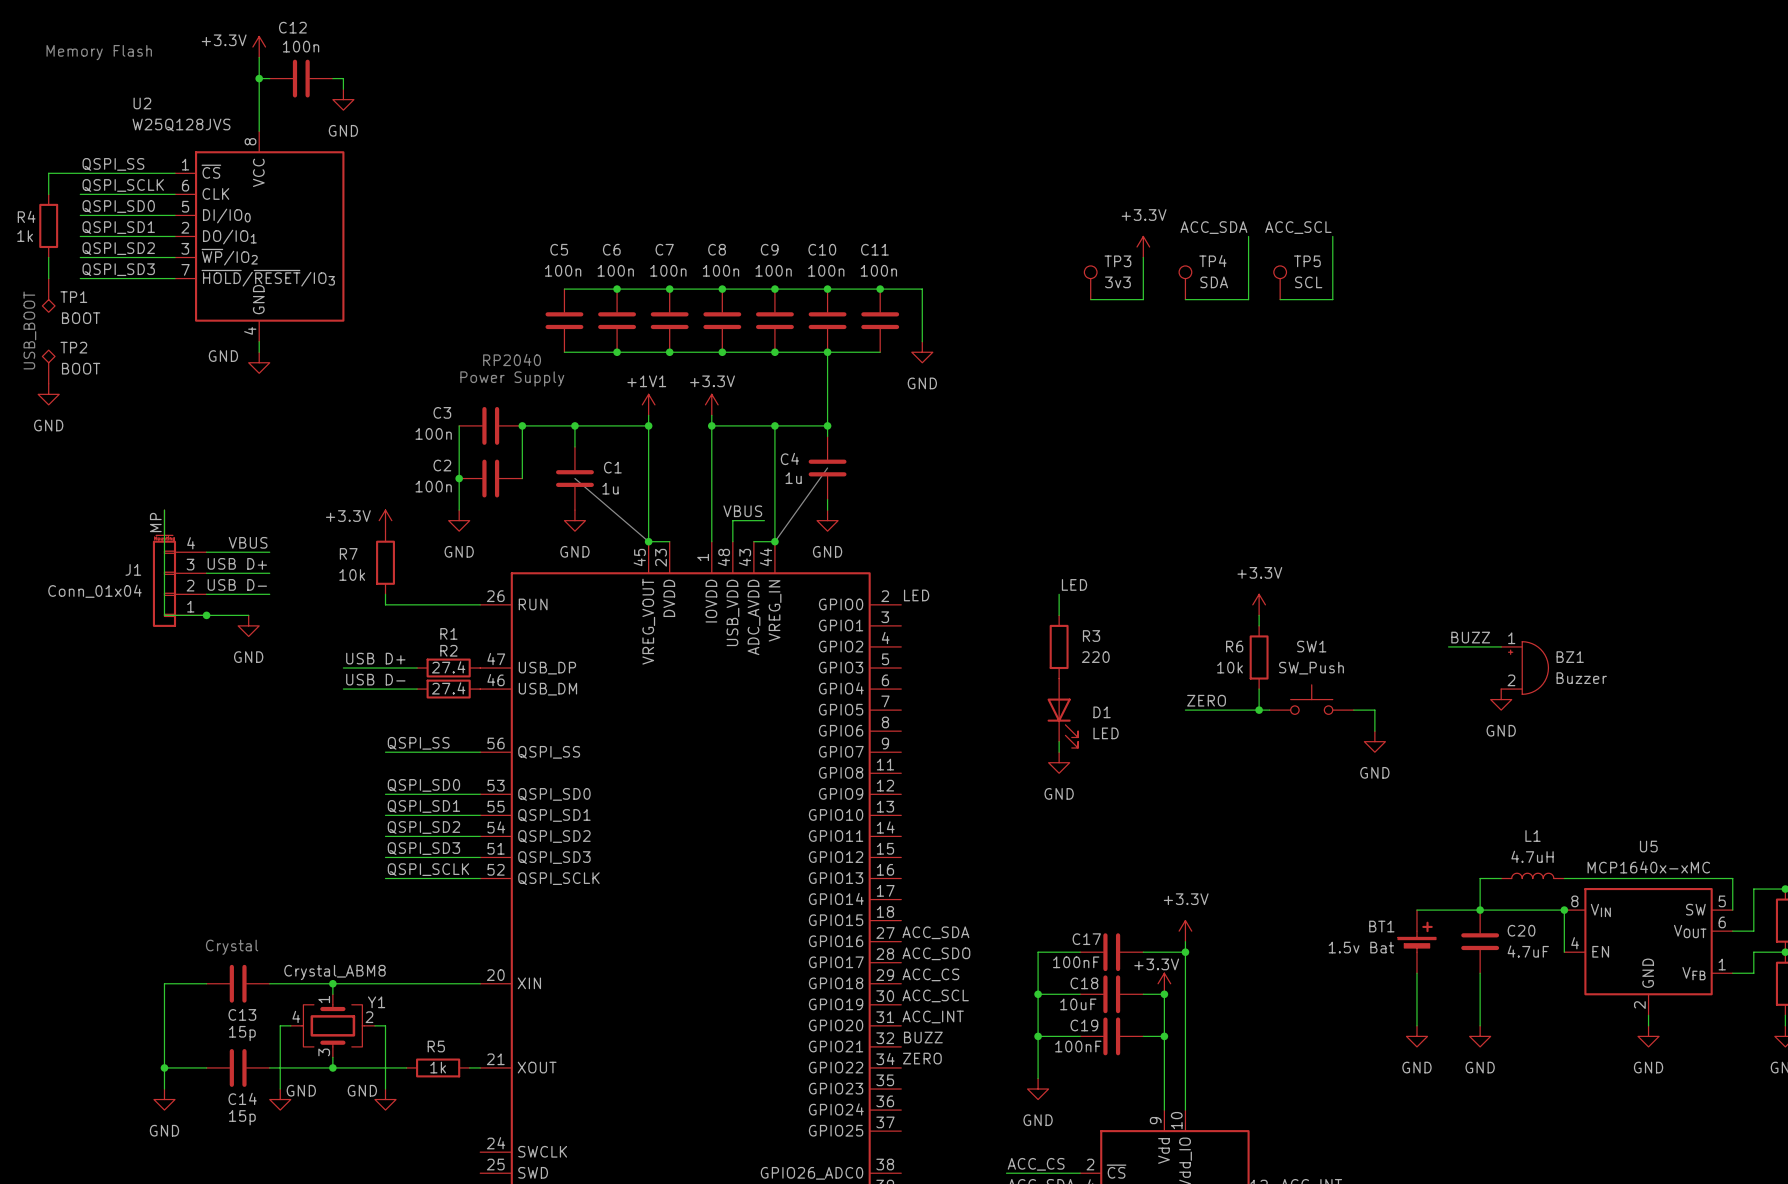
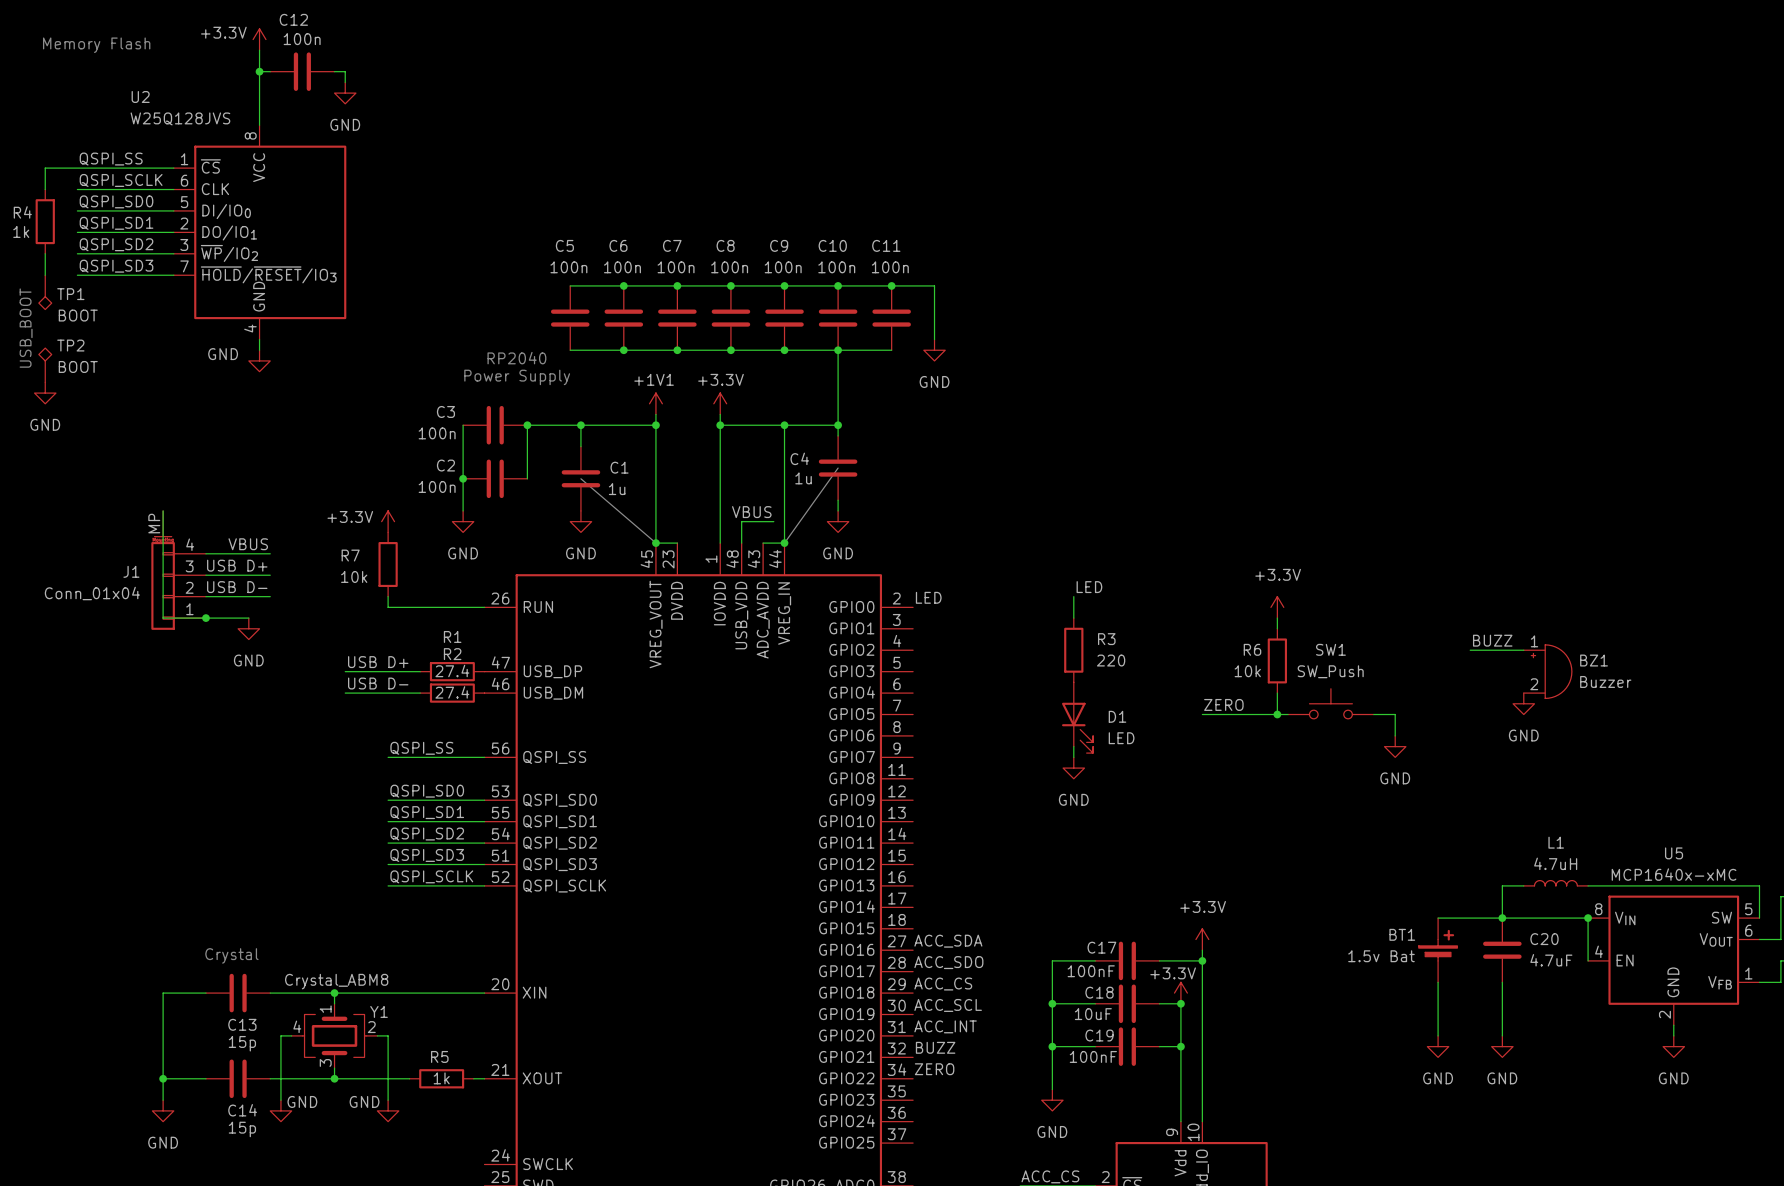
label: ACC_SDA (1213, 227) -> none
label: ACC_SCL (1298, 227) -> none
wire: (1248, 236) (1248, 299) (1185, 299) -> none
wire: (1332, 236) (1332, 299) (1280, 299) -> none
power symbol: +3.3V (1143, 246) -> none
wire: (1143, 257) (1143, 299) (1090, 299) -> none
TP3: 3v3 (1090, 282) -> none
TP4: SDA (1185, 282) -> none
TP5: SCL (1280, 282) -> none

